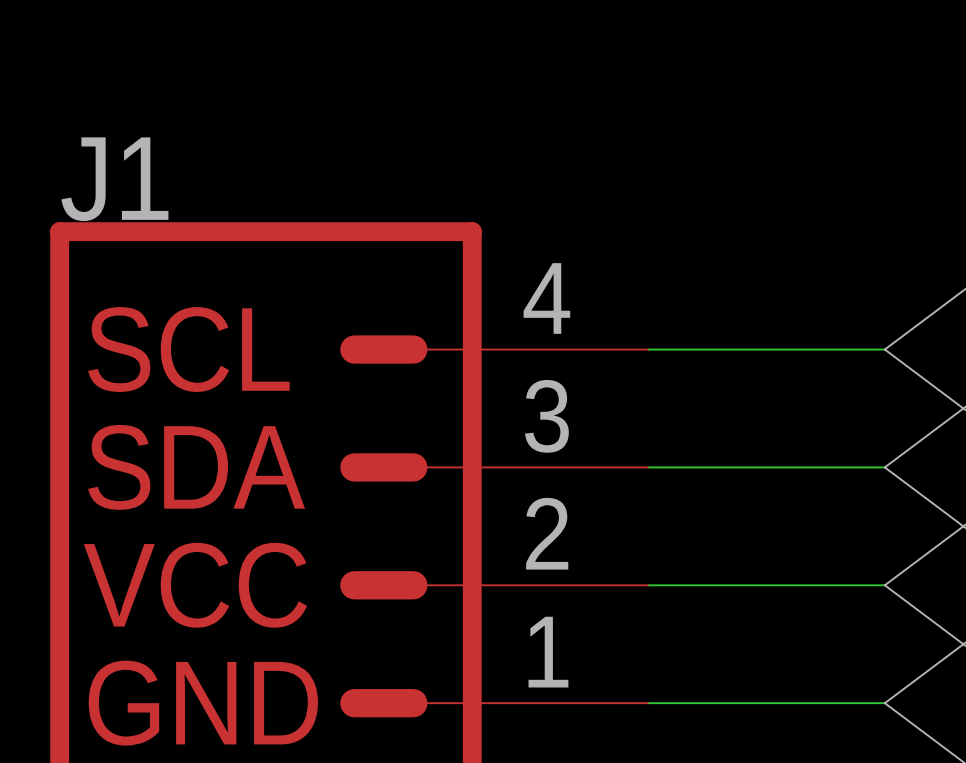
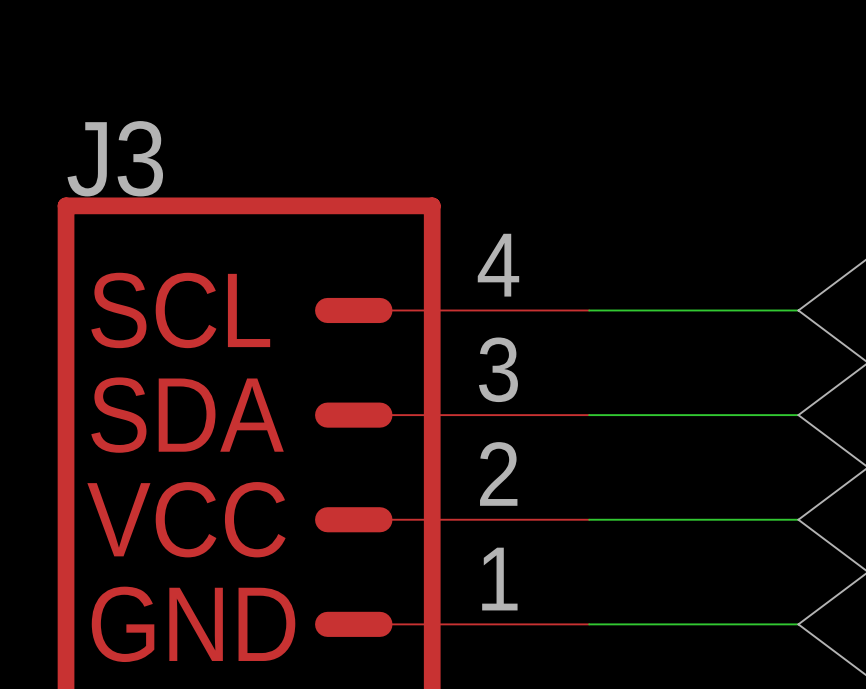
J1 name: J1 (114, 179) -> J3 (115, 158)

